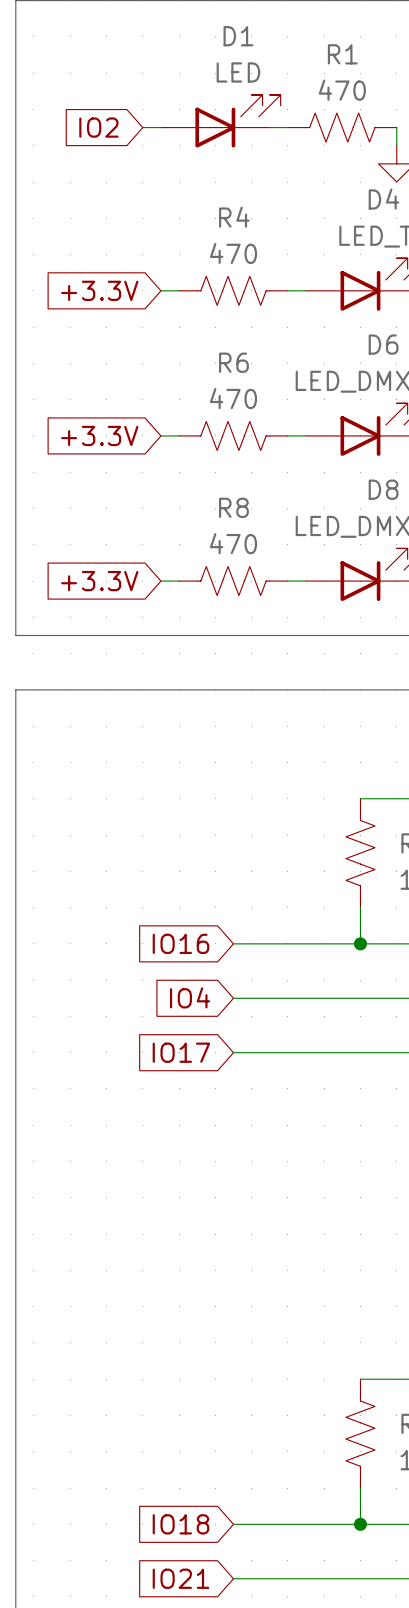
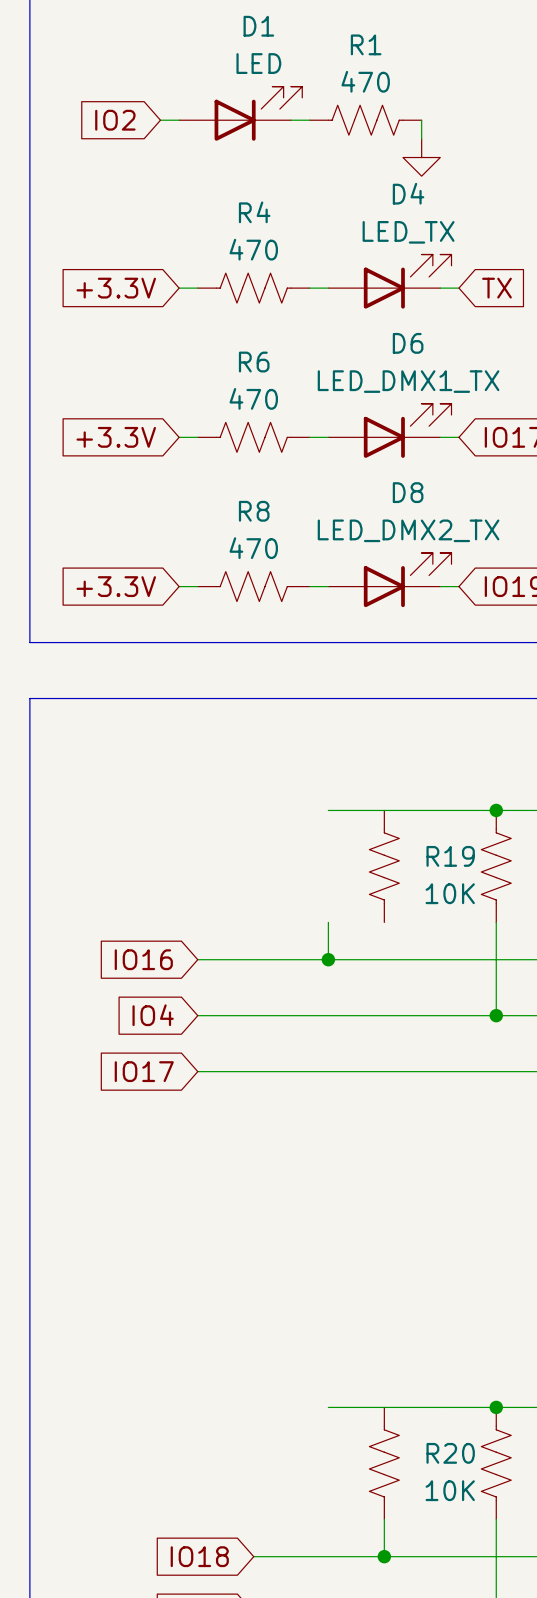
wire: none -> (328, 810) (384, 810)
wire: (360, 907) (360, 943) -> (328, 922) (328, 959)
wire: none -> (197, 959) (253, 959)
global label position: IO16 (180, 943) -> IO16 (143, 959)
junction position: (360, 943) -> (328, 959)
global label position: IO4 (190, 997) -> IO4 (153, 1015)
wire: none -> (197, 1015) (253, 1015)
wire: none -> (197, 1071) (253, 1071)
global label position: IO17 (181, 1052) -> IO17 (144, 1071)
wire: none -> (328, 1407) (384, 1407)

